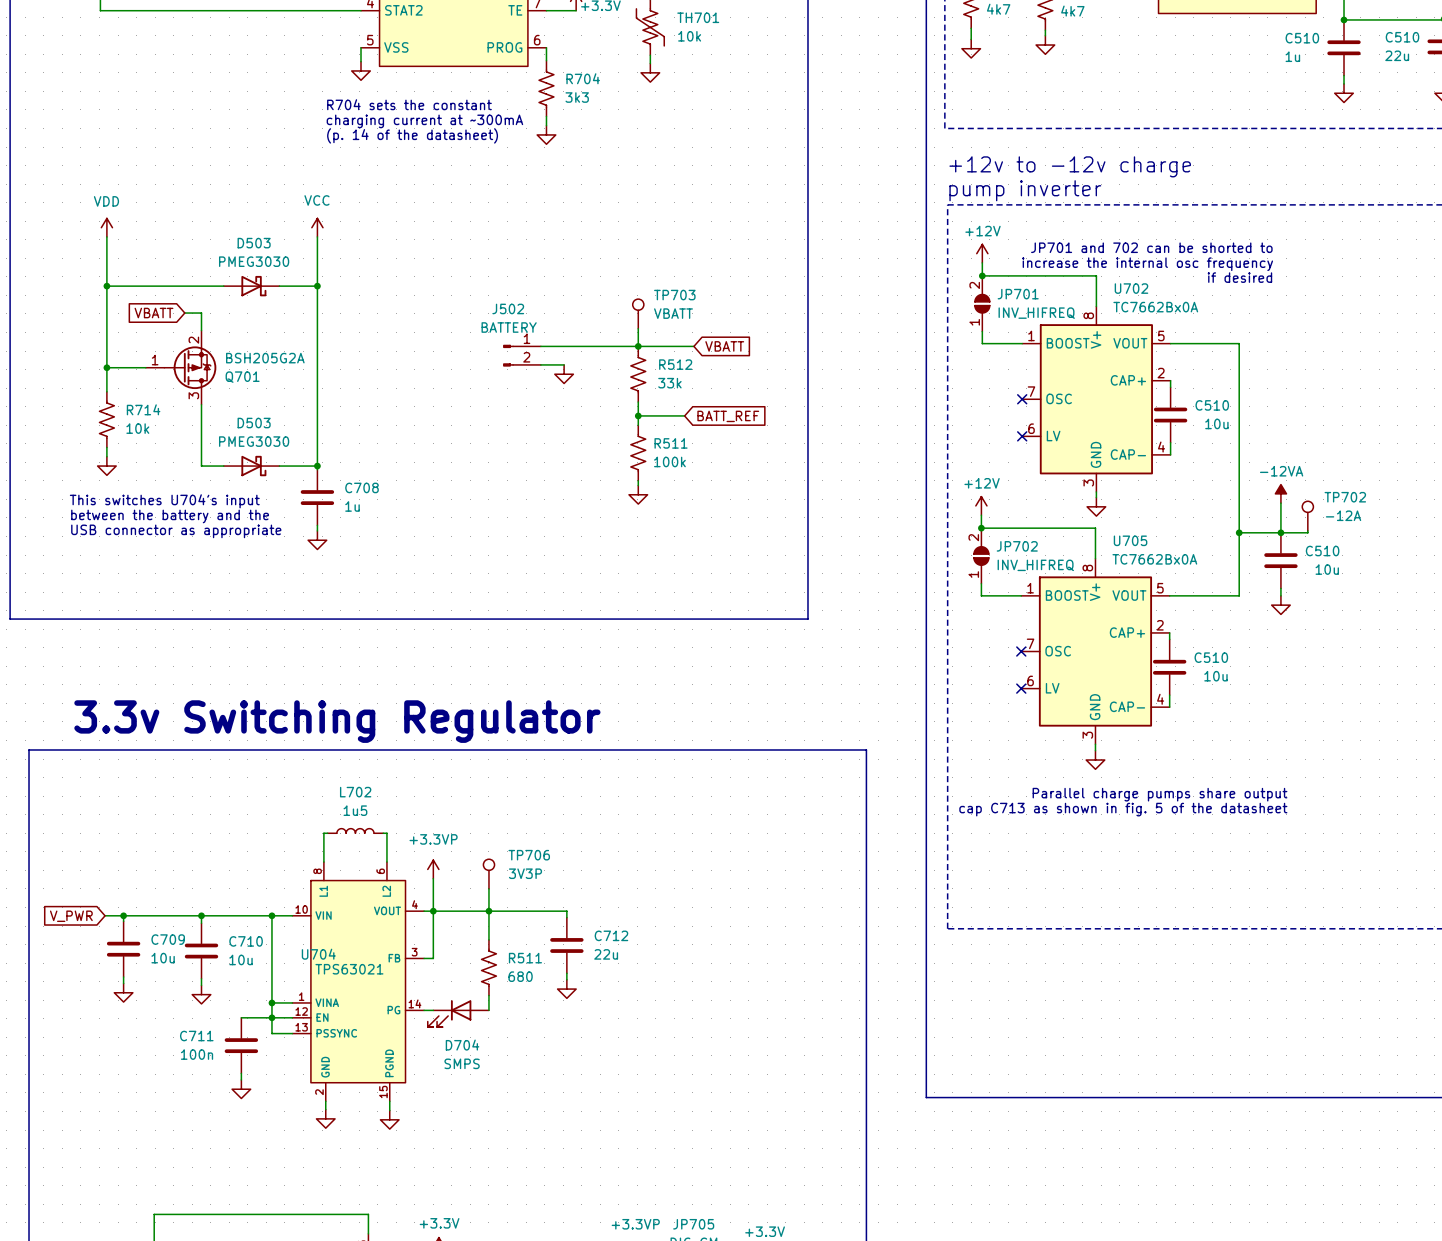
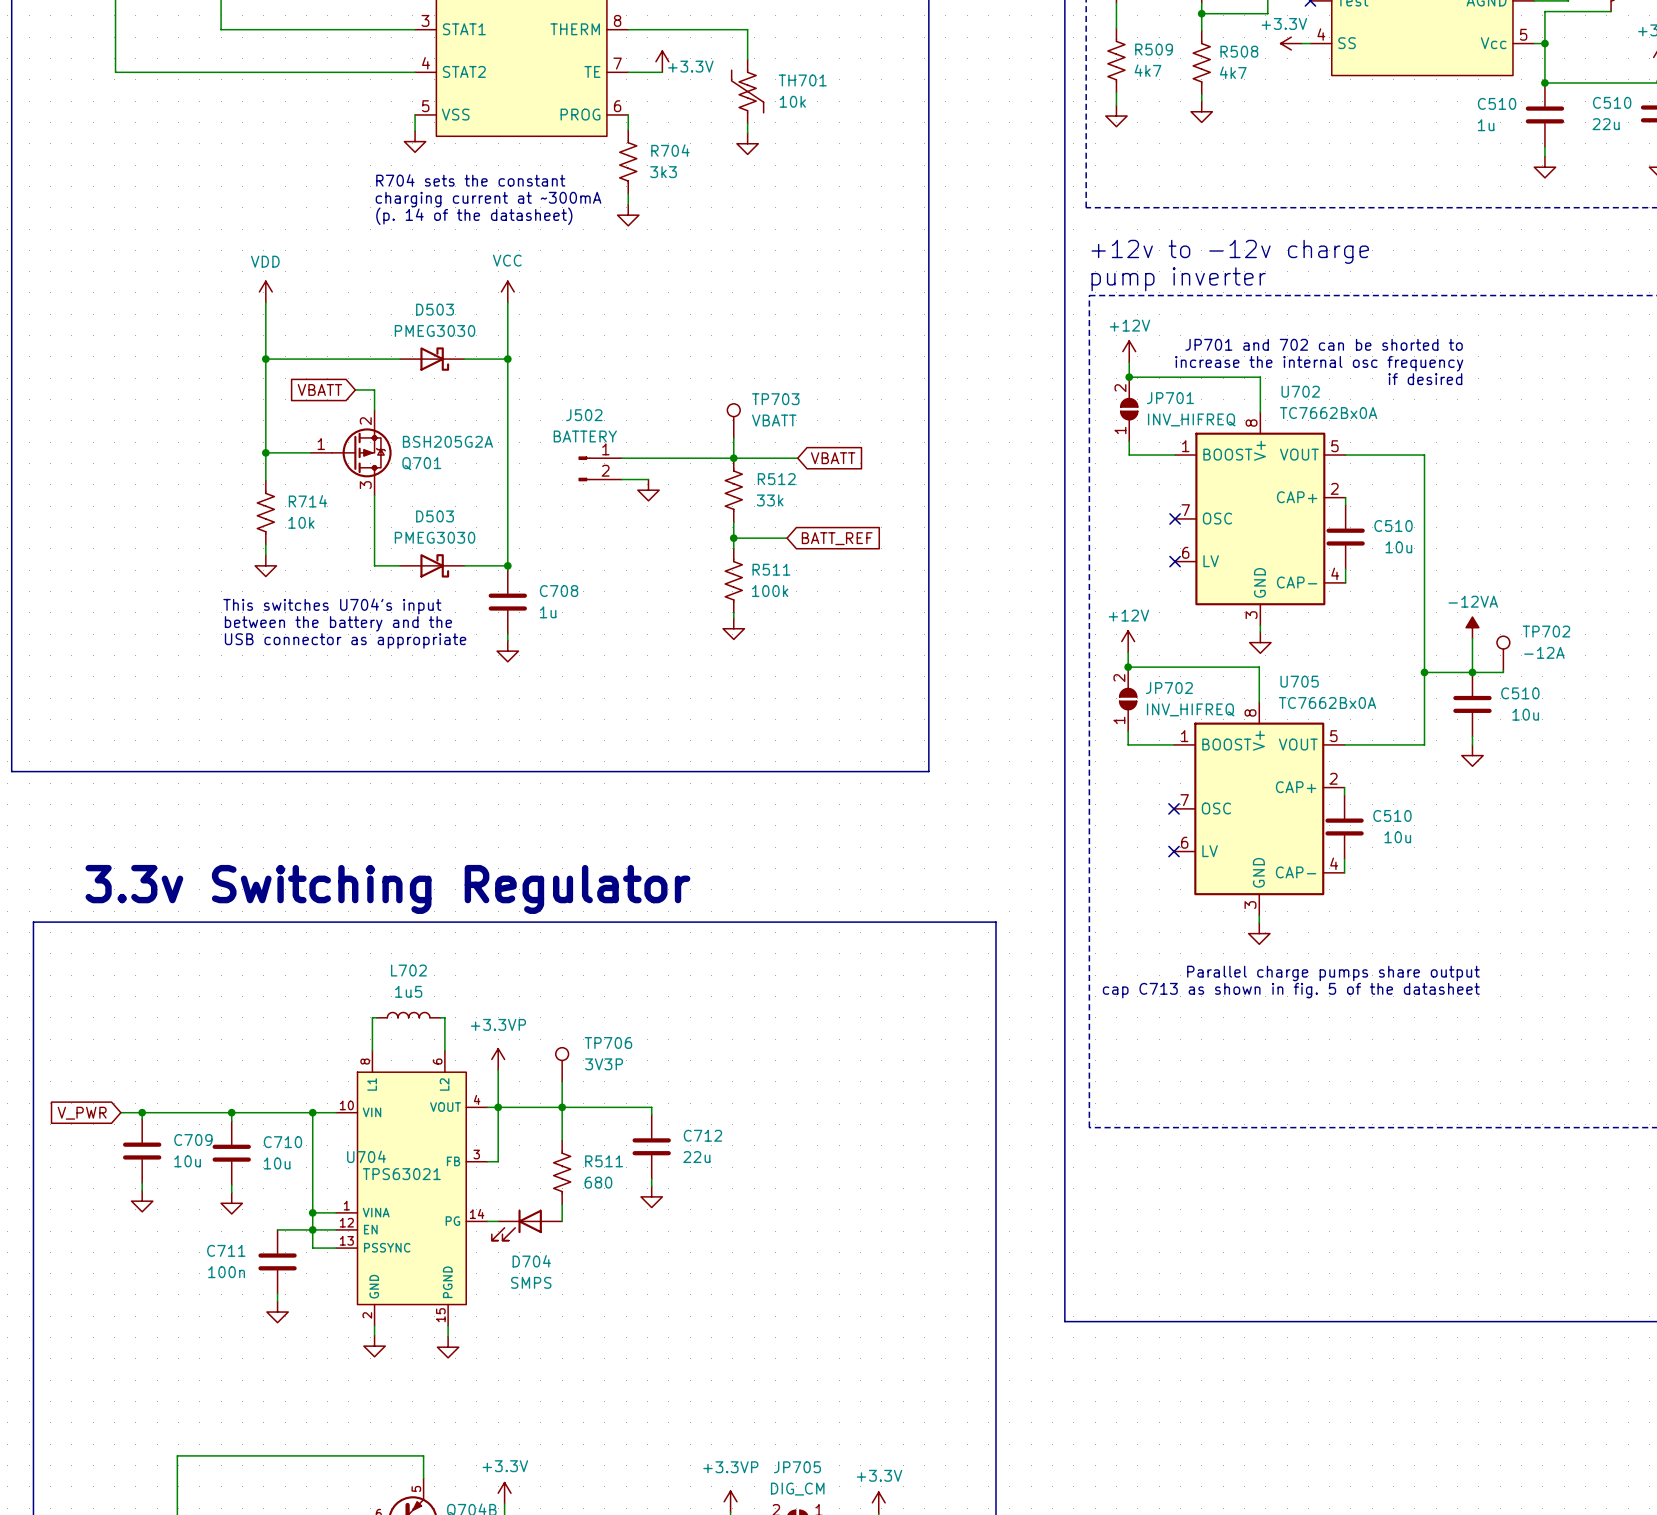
power symbol position: VDD (106, 227) -> VDD (265, 291)
power symbol position: VCC (317, 227) -> VCC (507, 291)
wire: (106, 236) (106, 391) -> (265, 302) (265, 480)
wire: (317, 236) (317, 469) -> (507, 302) (507, 570)
junction: none -> (265, 359)
D503: none -> PMEG3030 (432, 359)
junction: none -> (507, 359)
wire: (106, 286) (223, 286) -> (265, 359) (400, 359)
junction: (106, 286) -> none
D503: PMEG3030 (251, 286) -> none
wire: (279, 286) (317, 286) -> (464, 359) (507, 359)
junction: (317, 286) -> none
global label position: VBATT (153, 313) -> VBATT (319, 389)
wire: (184, 313) (201, 313) (201, 330) -> (355, 389) (374, 389) (374, 410)
junction: none -> (265, 452)
wire: (106, 367) (145, 367) -> (265, 452) (310, 452)
junction: (106, 367) -> none
Q701 position: (181, 367) -> (351, 452)
wire: (201, 404) (201, 466) (223, 466) -> (374, 495) (374, 565) (400, 565)
R714 position: (106, 419) -> (265, 512)
power symbol: none -> (265, 565)
D503: none -> PMEG3030 (432, 565)
junction: none -> (507, 565)
wire: (106, 447) (106, 456) -> (265, 544) (265, 555)
power symbol: (106, 466) -> none
D503: PMEG3030 (251, 466) -> none
wire: (279, 466) (317, 466) -> (464, 565) (507, 565)
junction: (317, 466) -> none
C708 position: (317, 497) -> (507, 602)
text position: This switches U704's input (164, 501) -> This switches U704's input (332, 606)
power symbol: none -> (507, 651)
text position: between the battery and the (170, 516) -> between the battery and the (338, 623)
wire: (317, 525) (317, 530) -> (507, 634) (507, 640)
text position: USB connector as appropriate (176, 531) -> USB connector as appropriate (345, 640)
power symbol: (317, 540) -> none

